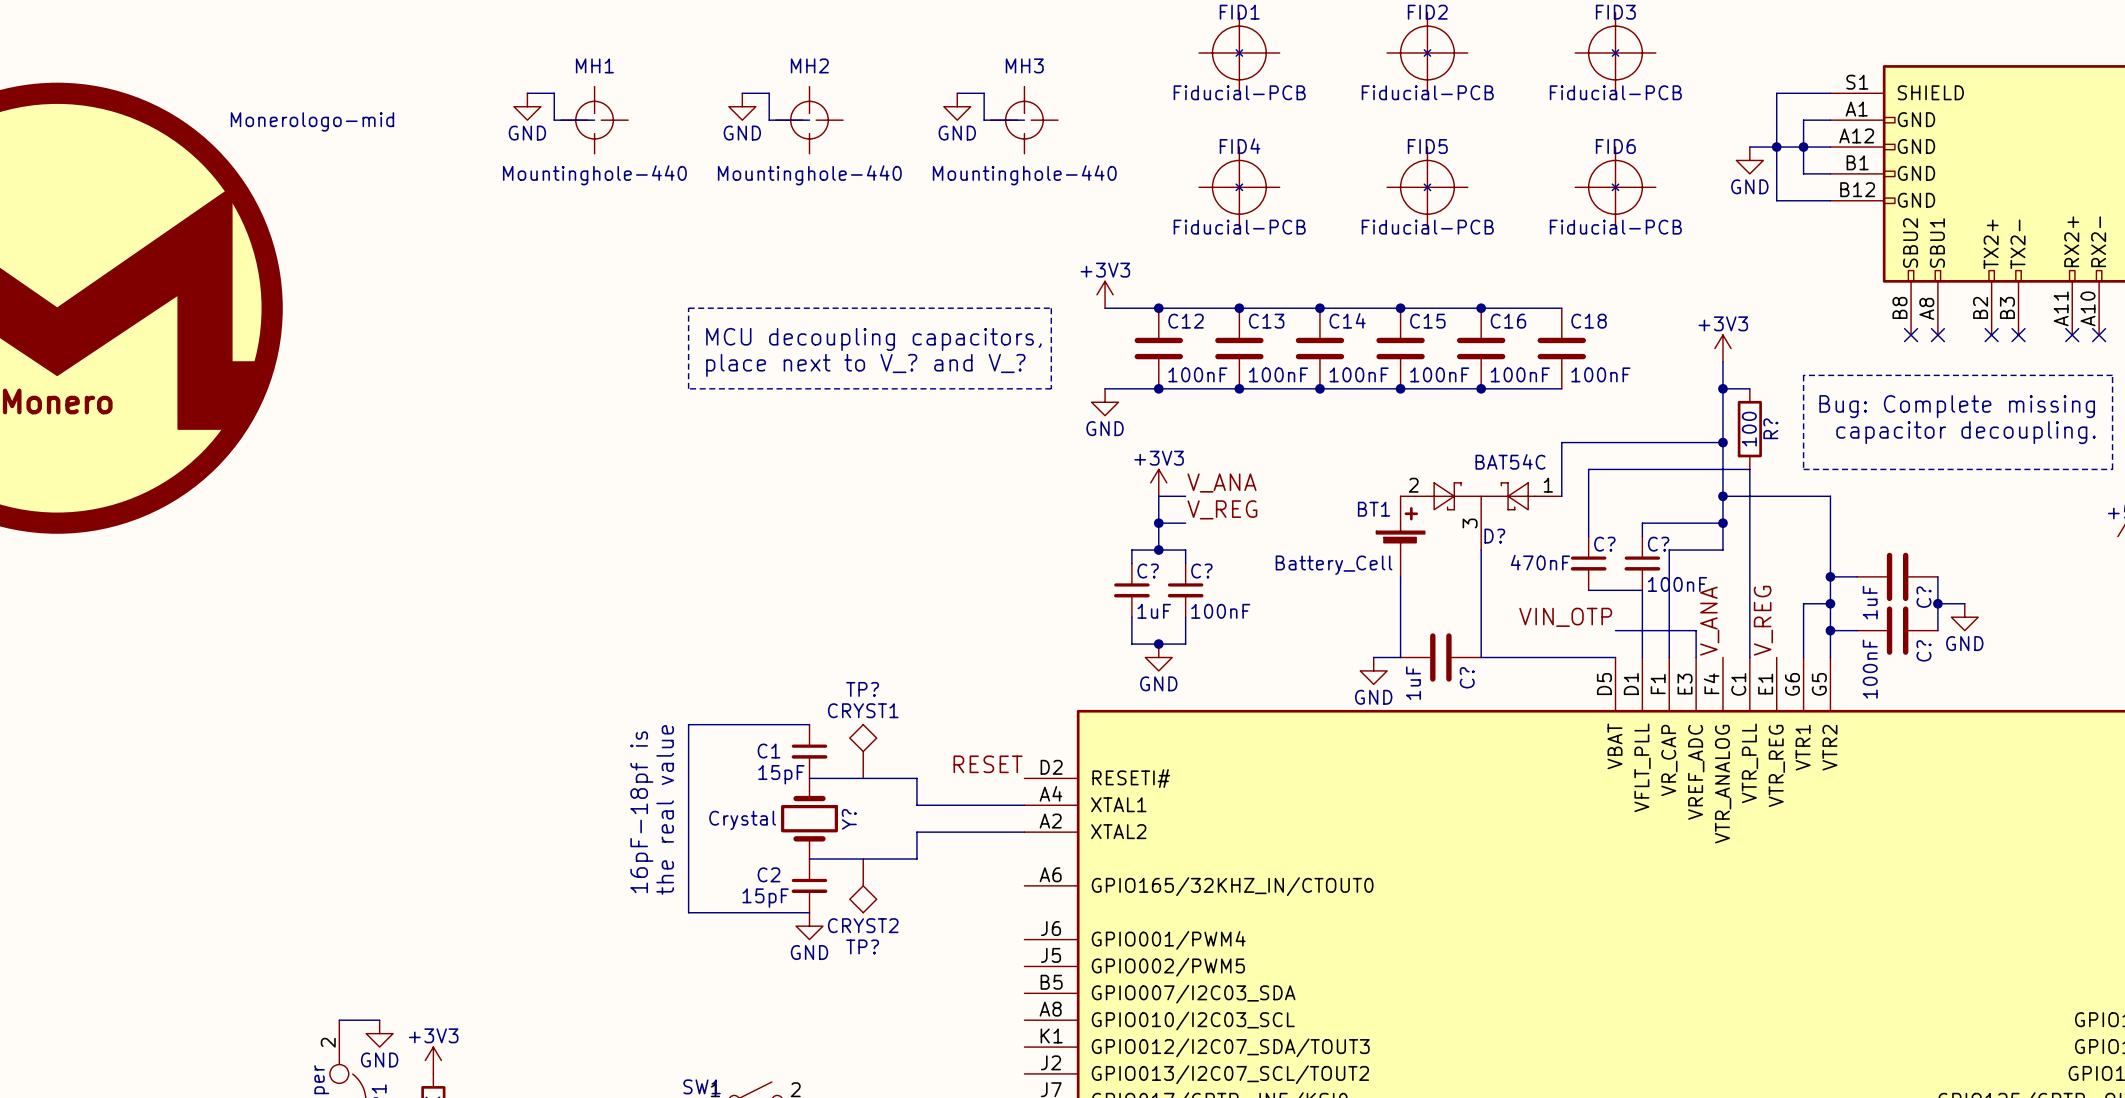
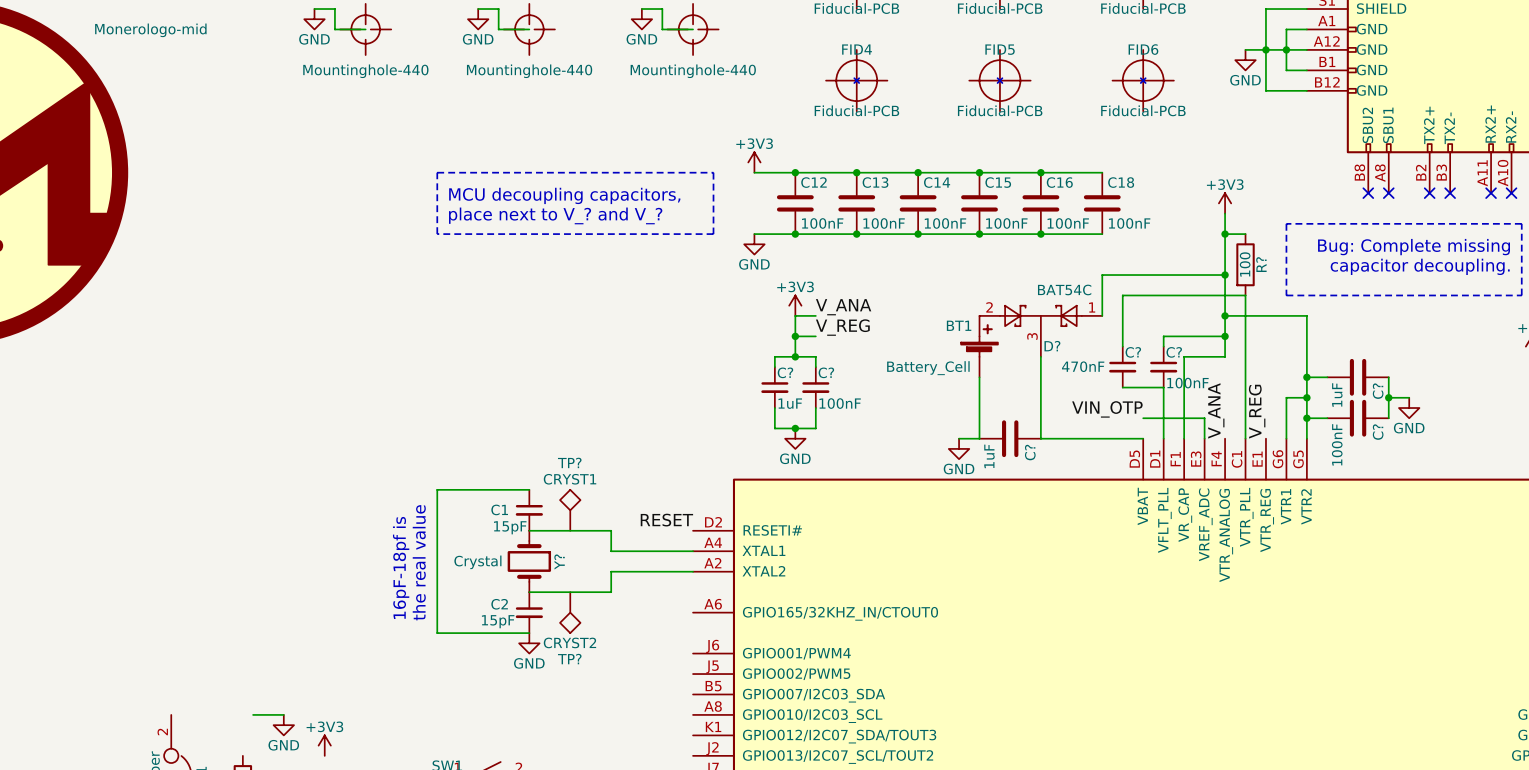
wire: (339, 1020) (379, 1020) -> (253, 714) (283, 714)
power symbol position: GND (379, 1033) -> GND (283, 725)
power symbol position: +3V3 (433, 1060) -> +3V3 (324, 745)

